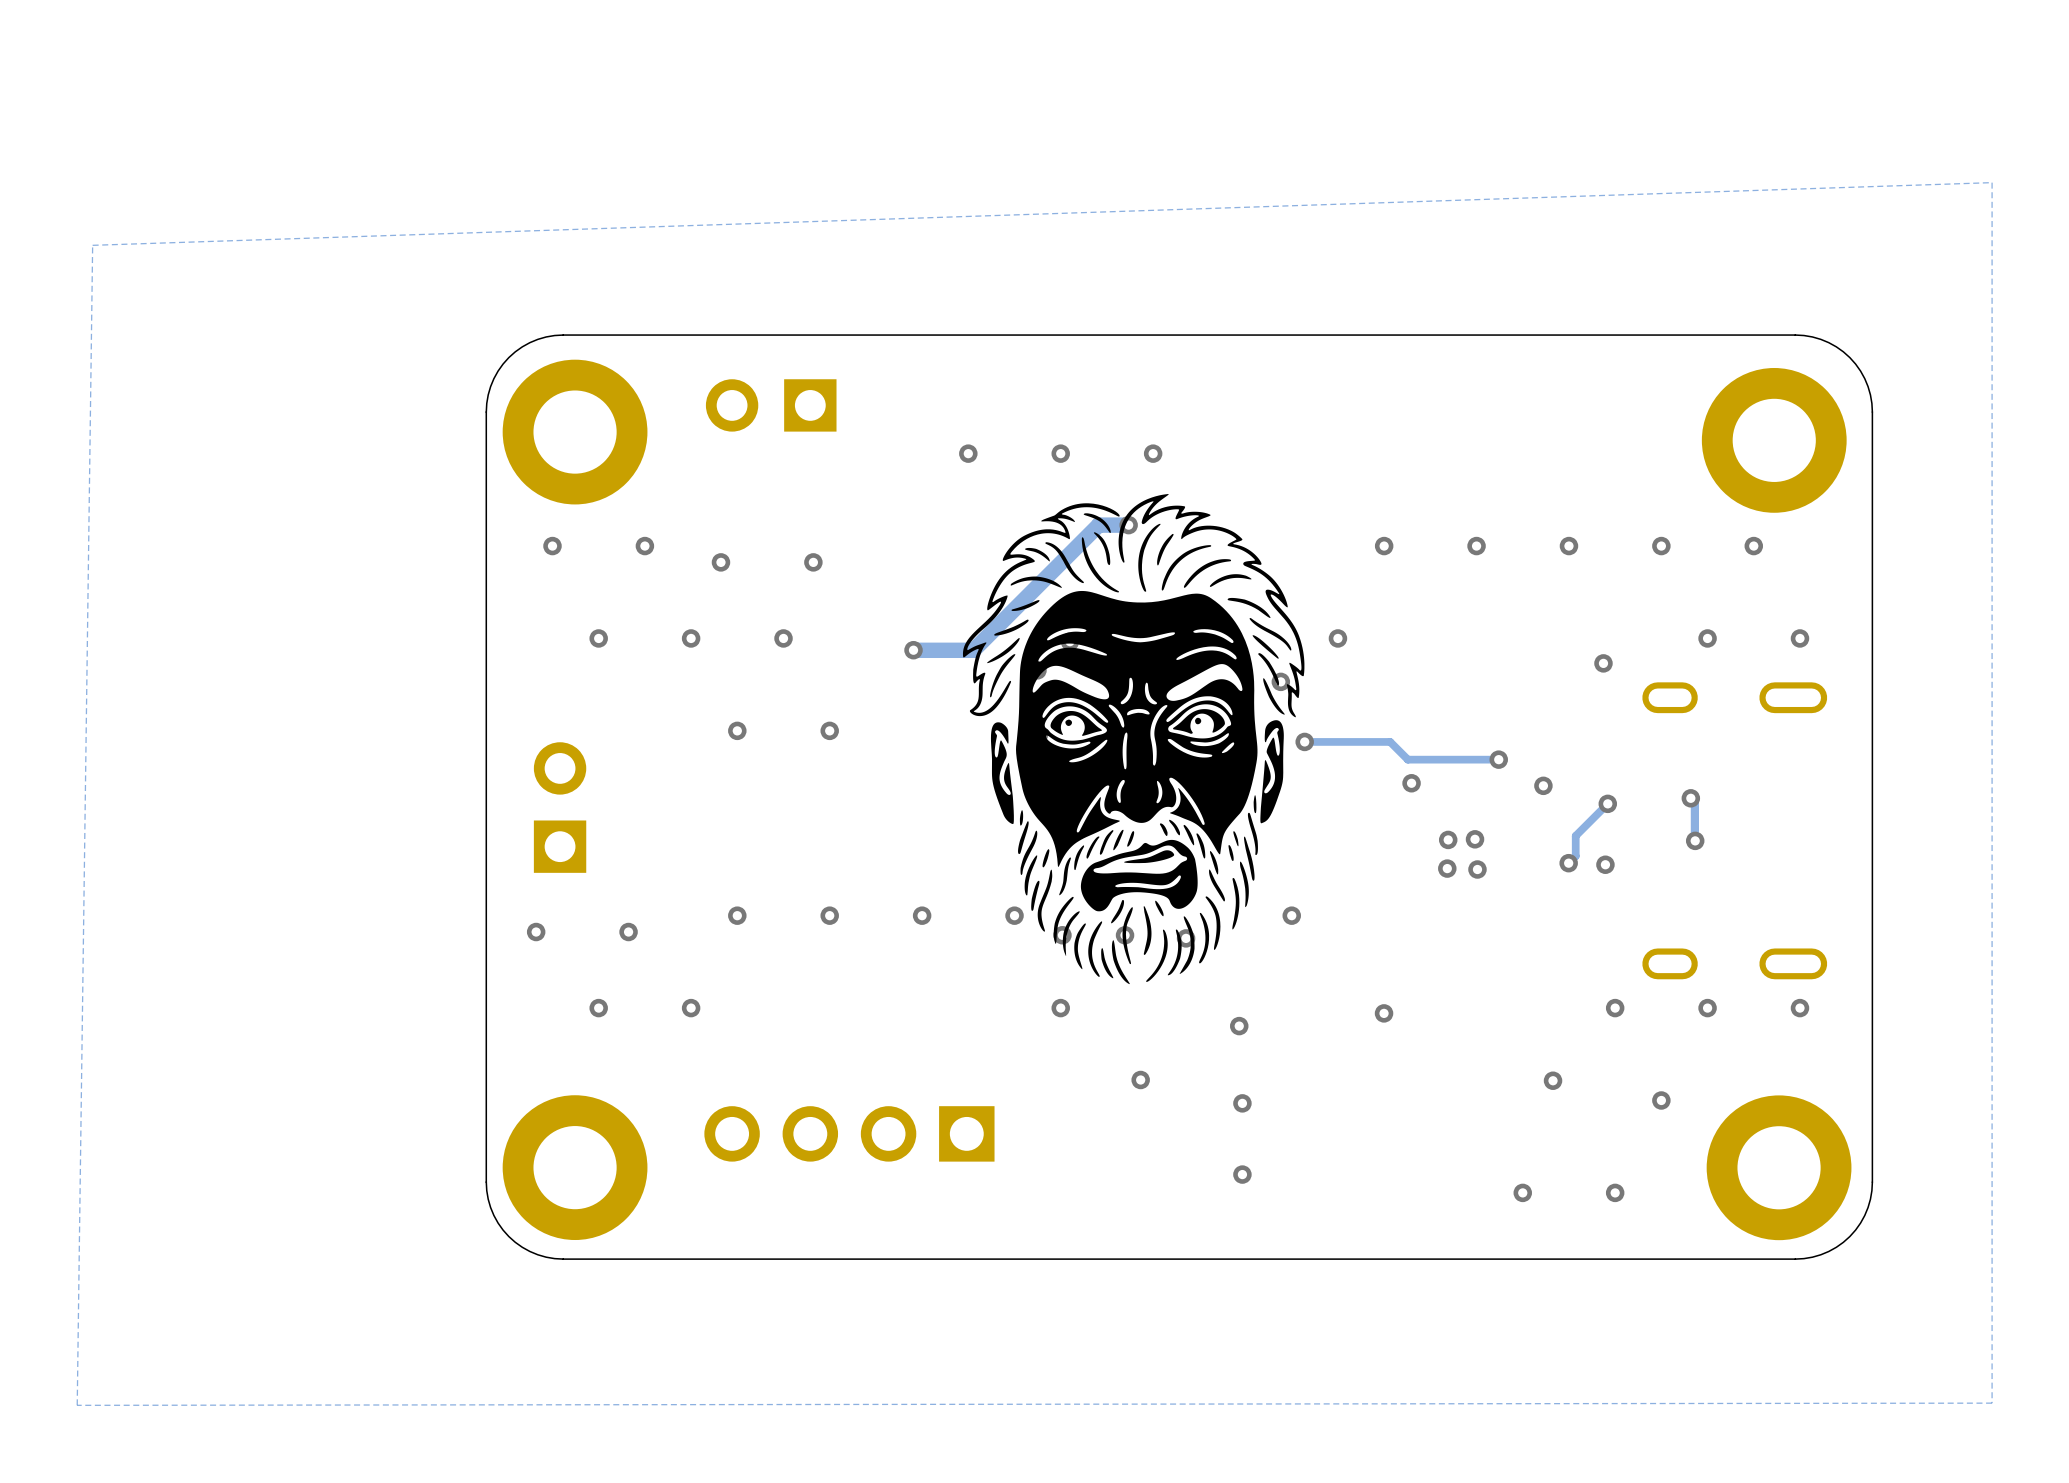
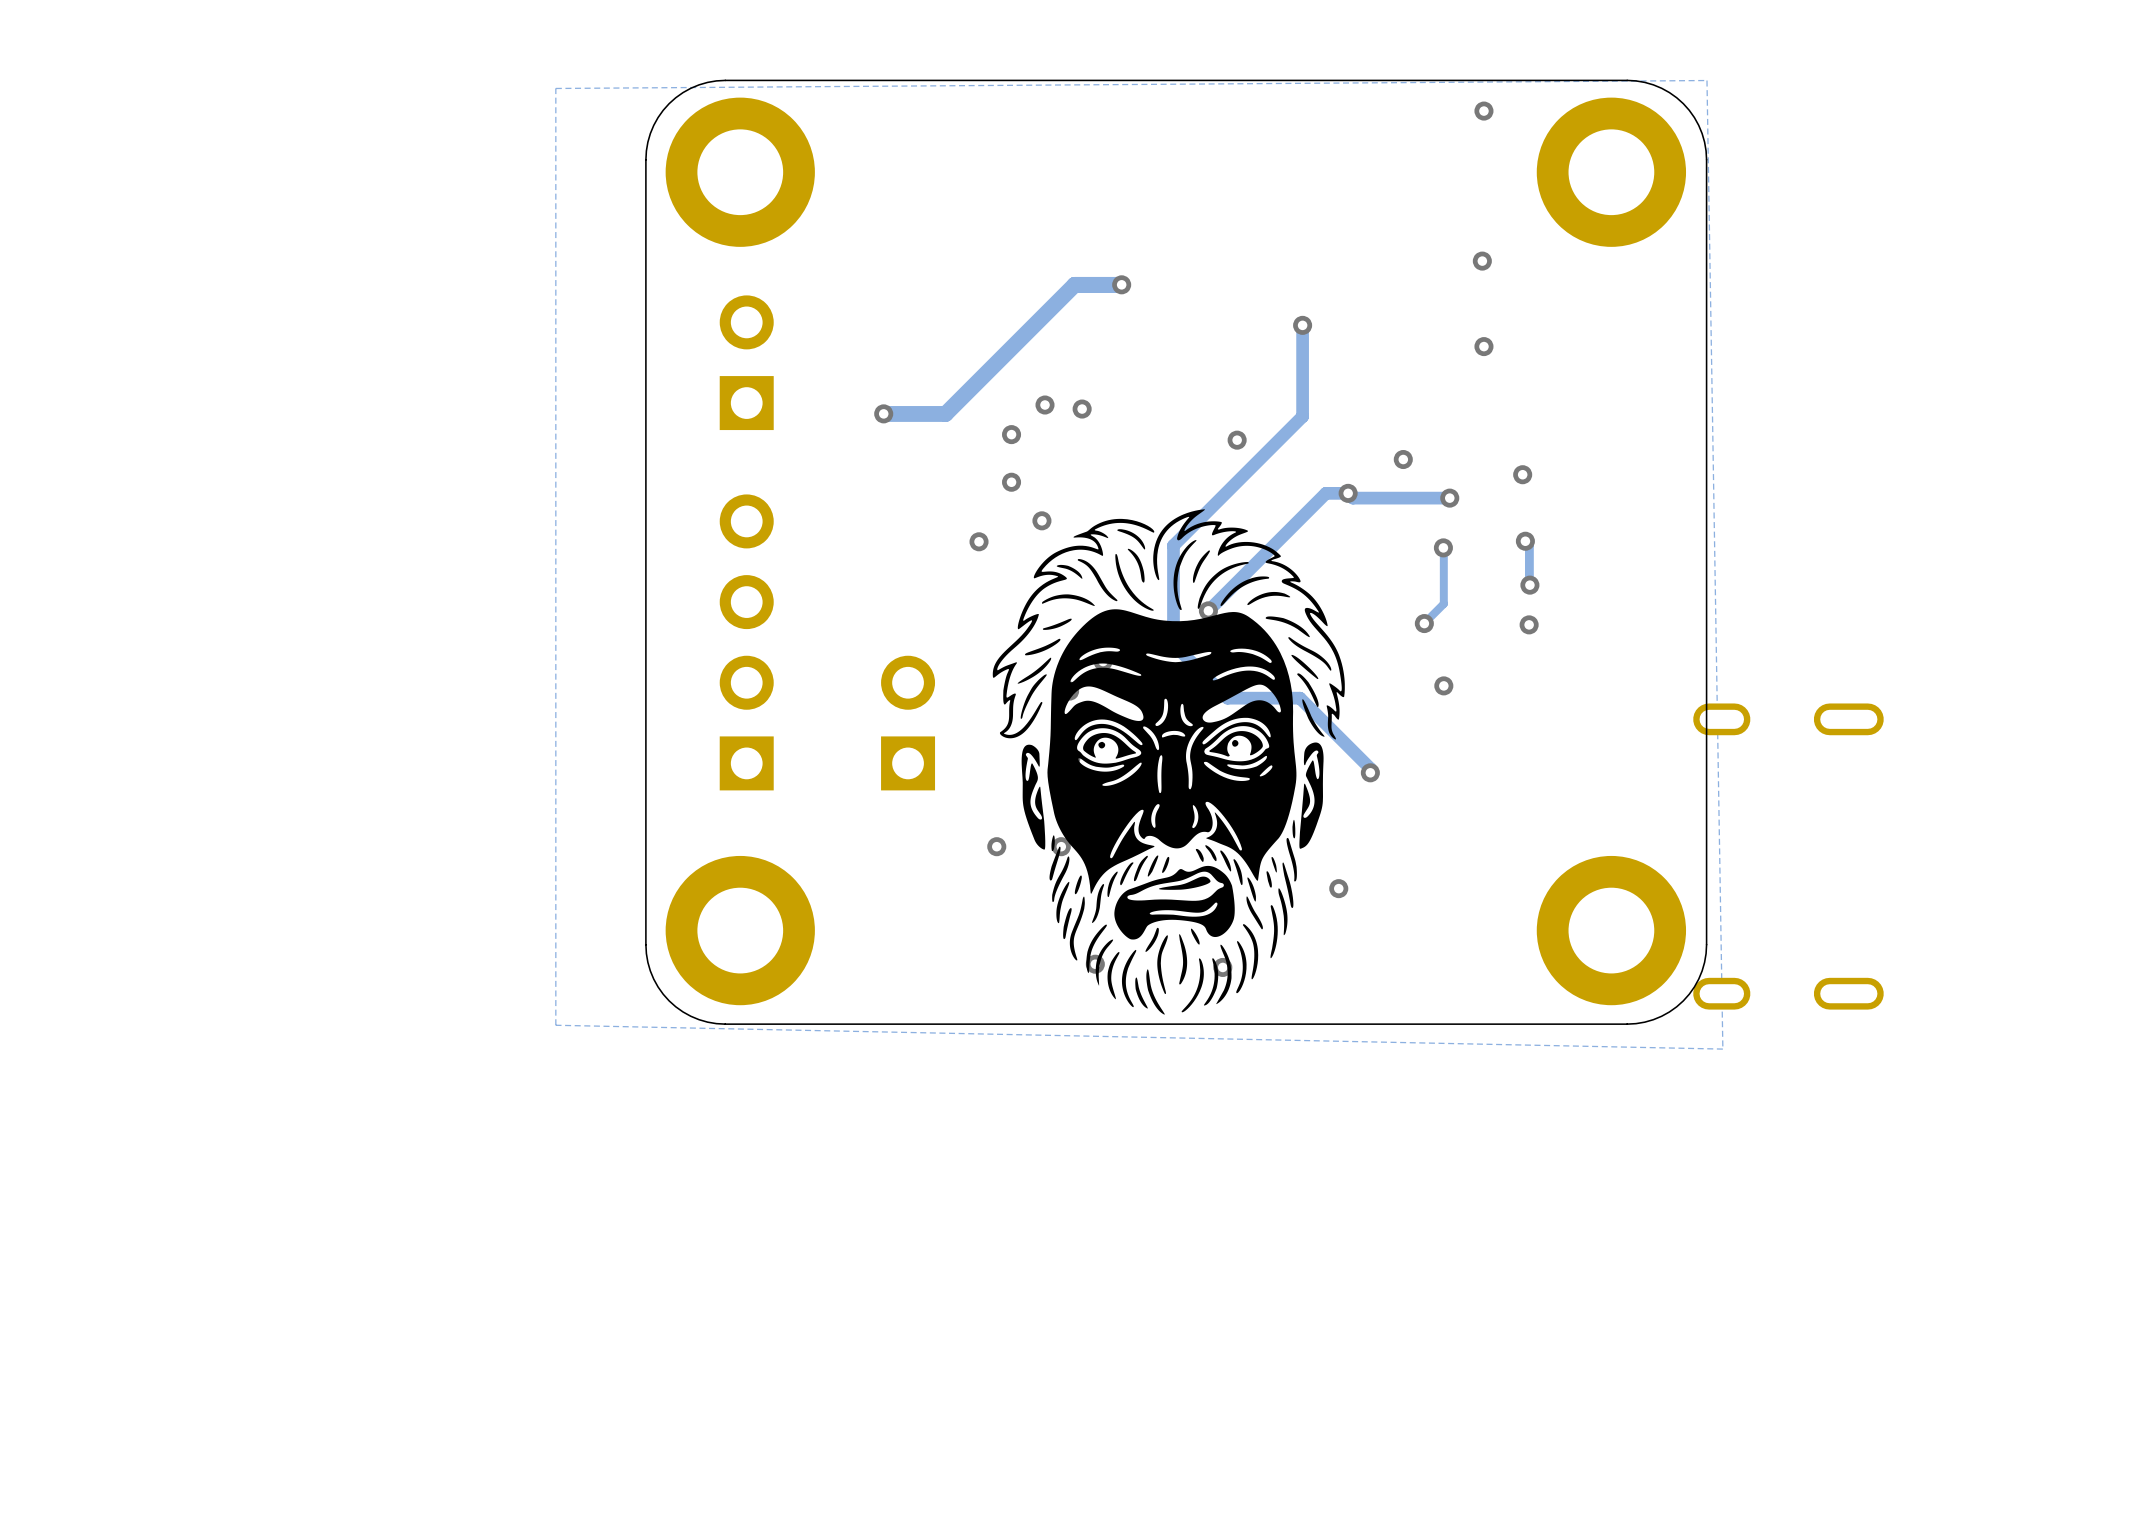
board edge: none -> (1627, 80) (725, 80) (699, 84) (683, 92) (669, 103) (653, 125) (647, 142) (645, 159) (645, 944) (647, 962) (653, 979) (669, 1000) (683, 1011) (699, 1019) (725, 1024) (1627, 1024) (1653, 1019) (1669, 1011) (1683, 1000) (1694, 986) (1702, 970) (1706, 944) (1706, 150) (1698, 125) (1683, 103) (1661, 88) (1644, 82) (1627, 80)
zone outline: none -> (1706, 80) (555, 88) (555, 1025) (1722, 1049) (1706, 80)
via: none -> (1483, 111)
part: none -> (740, 172)
part: none -> (1611, 172)
zone outline: (1992, 182) (1992, 1403) (77, 1405) (92, 245) (1992, 182) -> none
via: none -> (1482, 261)
track: none -> (1121, 284) (1074, 284) (945, 413) (883, 413)
via: none -> (1121, 284)
track: none -> (1302, 325) (1302, 416) (1173, 545) (1173, 644) (1227, 698) (1300, 698) (1370, 768) (1370, 772)
via: none -> (1302, 325)
board edge: (1795, 335) (563, 335) (537, 339) (522, 346) (508, 357) (498, 371) (490, 386) (486, 412) (486, 1182) (488, 1199) (498, 1223) (508, 1236) (529, 1251) (546, 1257) (563, 1259) (1795, 1259) (1812, 1257) (1836, 1247) (1849, 1236) (1860, 1223) (1868, 1207) (1872, 1182) (1872, 412) (1870, 394) (1864, 378) (1849, 357) (1828, 342) (1812, 336) (1795, 335) -> none
via: none -> (1483, 346)
via: none -> (1045, 405)
via: none -> (1082, 409)
via: none -> (883, 413)
part rotation: 0° (771, 405) -> 90° clockwise (746, 362)
via: none -> (1011, 434)
part: (575, 432) -> none
part: (1774, 440) -> none
via: none -> (1403, 459)
via position: (968, 453) -> (1011, 482)
via: (1060, 453) -> none
via position: (1153, 453) -> (1237, 440)
via: none -> (1522, 474)
via: none -> (1348, 493)
track: none -> (1449, 498) (1352, 498) (1348, 493) (1325, 493) (1208, 610)
via: none -> (1449, 498)
via: none -> (1041, 520)
via: none -> (1525, 541)
via: none -> (979, 541)
track: (1128, 525) (1098, 525) (973, 650) (913, 650) -> none
via: (1128, 525) -> none
track: none -> (1443, 548) (1443, 603) (1424, 623)
via: (552, 546) -> none
via: (644, 546) -> none
via position: (1384, 546) -> (1443, 547)
via: (1476, 546) -> none
via: (1568, 546) -> none
via: (1661, 546) -> none
via: (1753, 546) -> none
via: (720, 562) -> none
via: (813, 562) -> none
via: none -> (1529, 585)
via: none -> (1208, 610)
via: none -> (1424, 623)
via: none -> (1529, 624)
part: none -> (746, 642)
via: (598, 638) -> none
via: (691, 638) -> none
via: (783, 638) -> none
via: (1337, 638) -> none
via: (1707, 638) -> none
via: (1799, 638) -> none
via: (913, 650) -> none
via: (1603, 663) -> none
via: none -> (1443, 685)
via: (1280, 681) -> none
part: none -> (908, 723)
via: (737, 730) -> none
via: (829, 730) -> none
track: (1304, 741) (1390, 741) (1407, 759) (1498, 759) -> none
via position: (1304, 741) -> (1370, 772)
via: (1498, 759) -> none
via: (1411, 783) -> none
via: (1543, 785) -> none
track: (1690, 798) (1694, 802) (1695, 840) -> (1525, 541) (1529, 545) (1529, 585)
via: (1690, 798) -> none
track: (1607, 803) (1575, 835) (1575, 856) (1568, 863) -> none
via: (1607, 803) -> none
part: (560, 807) -> none
via: none -> (996, 846)
via: none -> (1061, 846)
via: (1448, 839) -> none
via: (1475, 839) -> none
via: (1695, 840) -> none
via: (1568, 863) -> none
via: (1605, 864) -> none
via: (1447, 868) -> none
via: (1477, 869) -> none
part: none -> (740, 930)
part: none -> (1611, 930)
via: (737, 915) -> none
via: (829, 915) -> none
via: (922, 915) -> none
via: (1014, 915) -> none
via position: (1291, 915) -> (1338, 888)
via: (536, 932) -> none
via: (628, 932) -> none
via: (1125, 935) -> none
via: (598, 1008) -> none
via: (691, 1008) -> none
via: (1060, 1008) -> none
via: (1615, 1008) -> none
via: (1707, 1008) -> none
via: (1799, 1008) -> none
via: (1384, 1013) -> none
via: (1239, 1026) -> none
via: (1140, 1079) -> none
via: (1553, 1080) -> none
via: (1661, 1100) -> none
via: (1242, 1103) -> none
part: (849, 1133) -> none
part: (575, 1167) -> none
part: (1779, 1167) -> none
via: (1242, 1174) -> none
via: (1522, 1192) -> none
via: (1615, 1192) -> none

